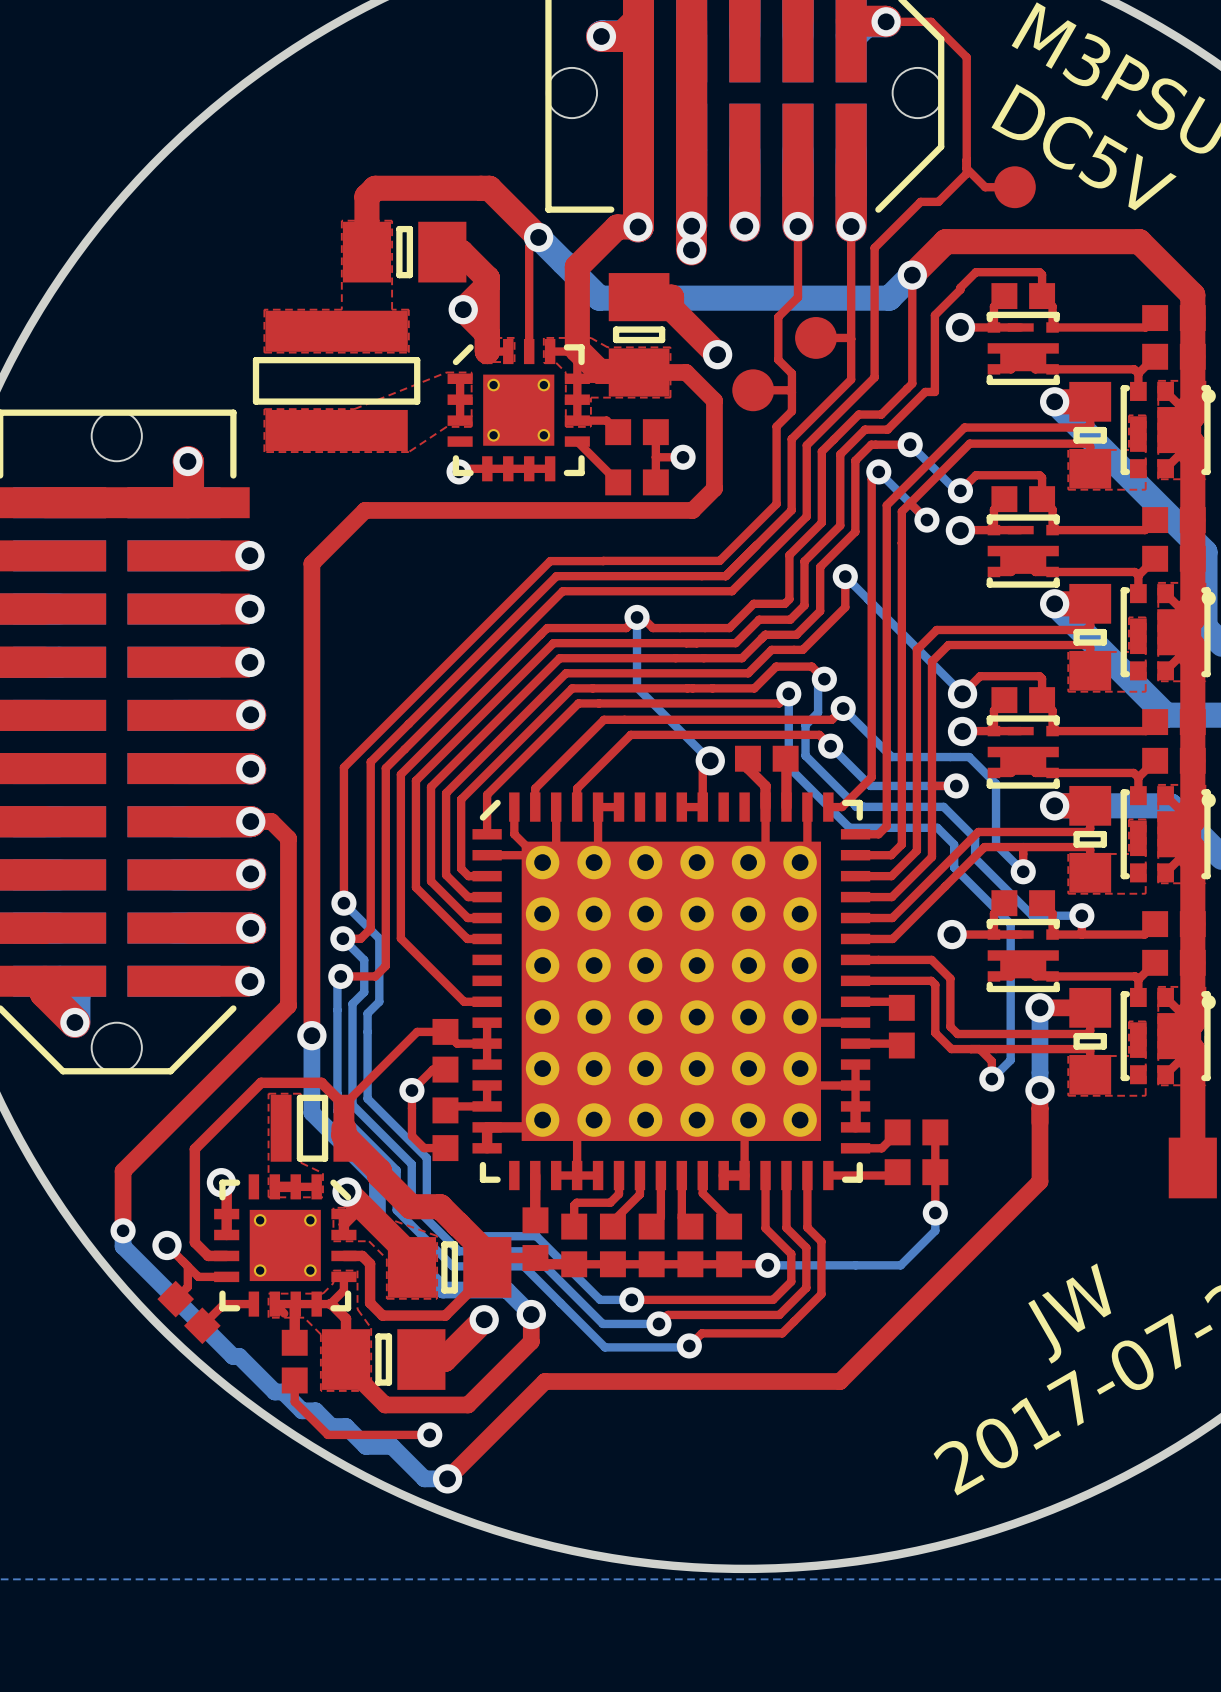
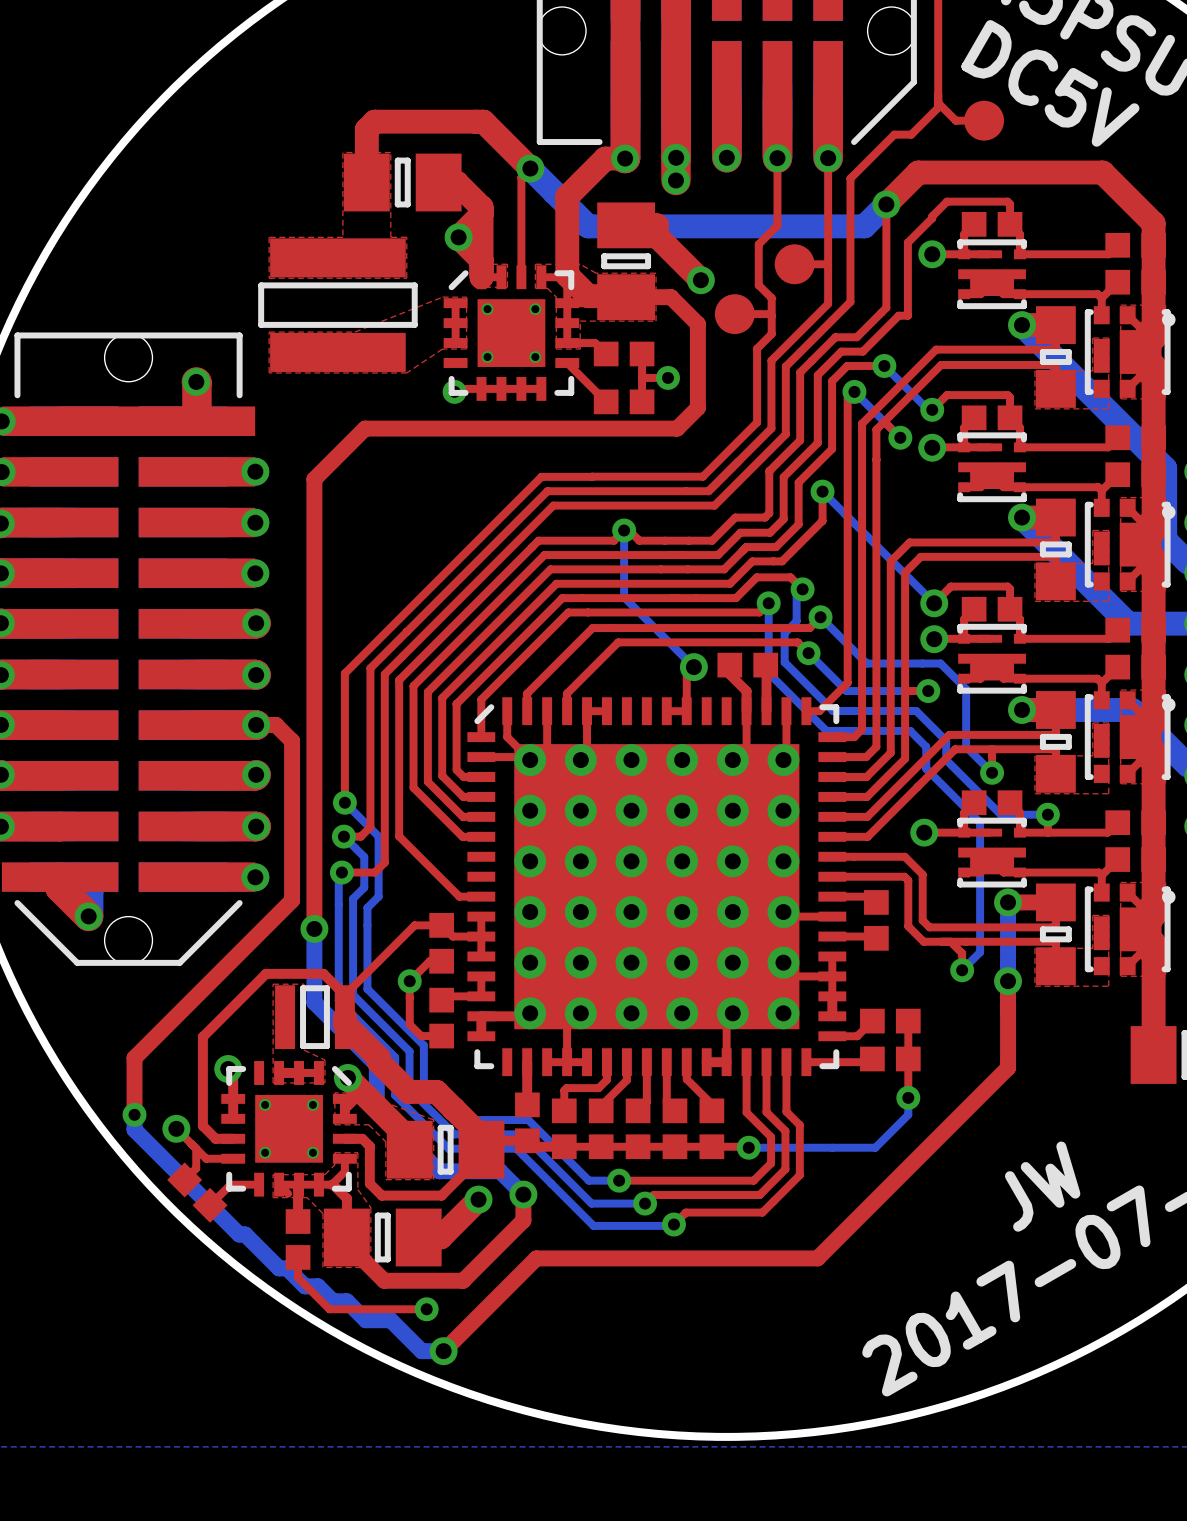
part footprint: [472, 792, 871, 1191] -> [467, 697, 847, 1077]

